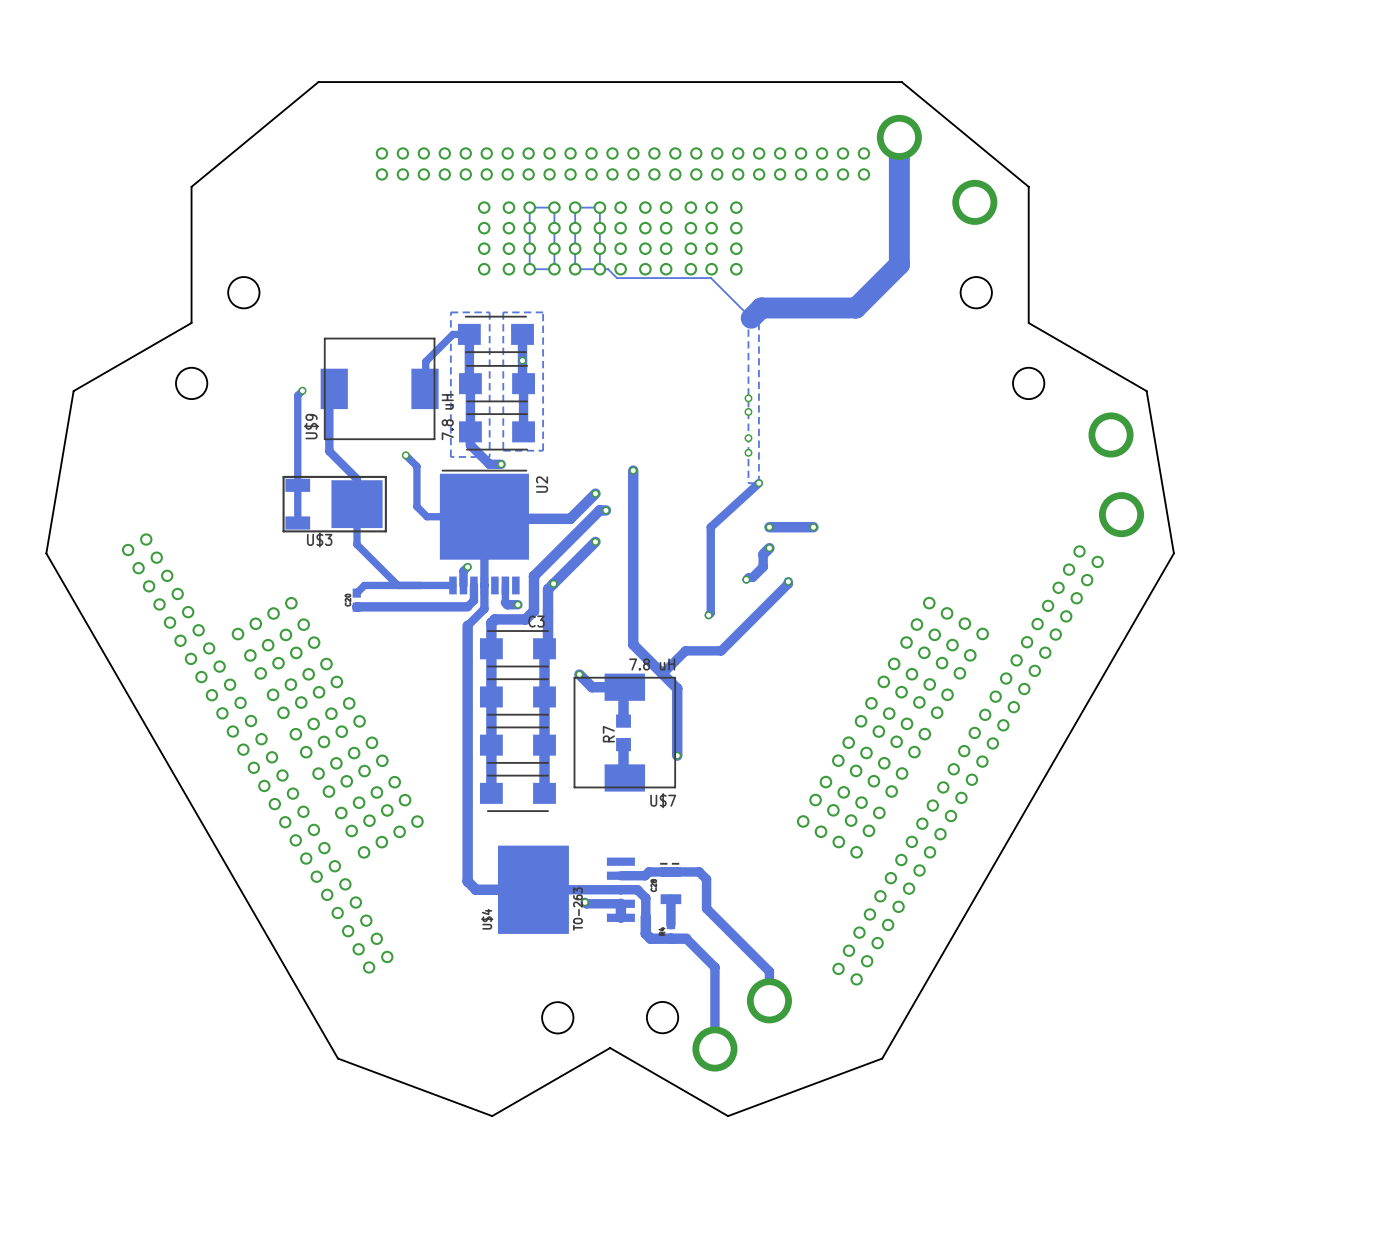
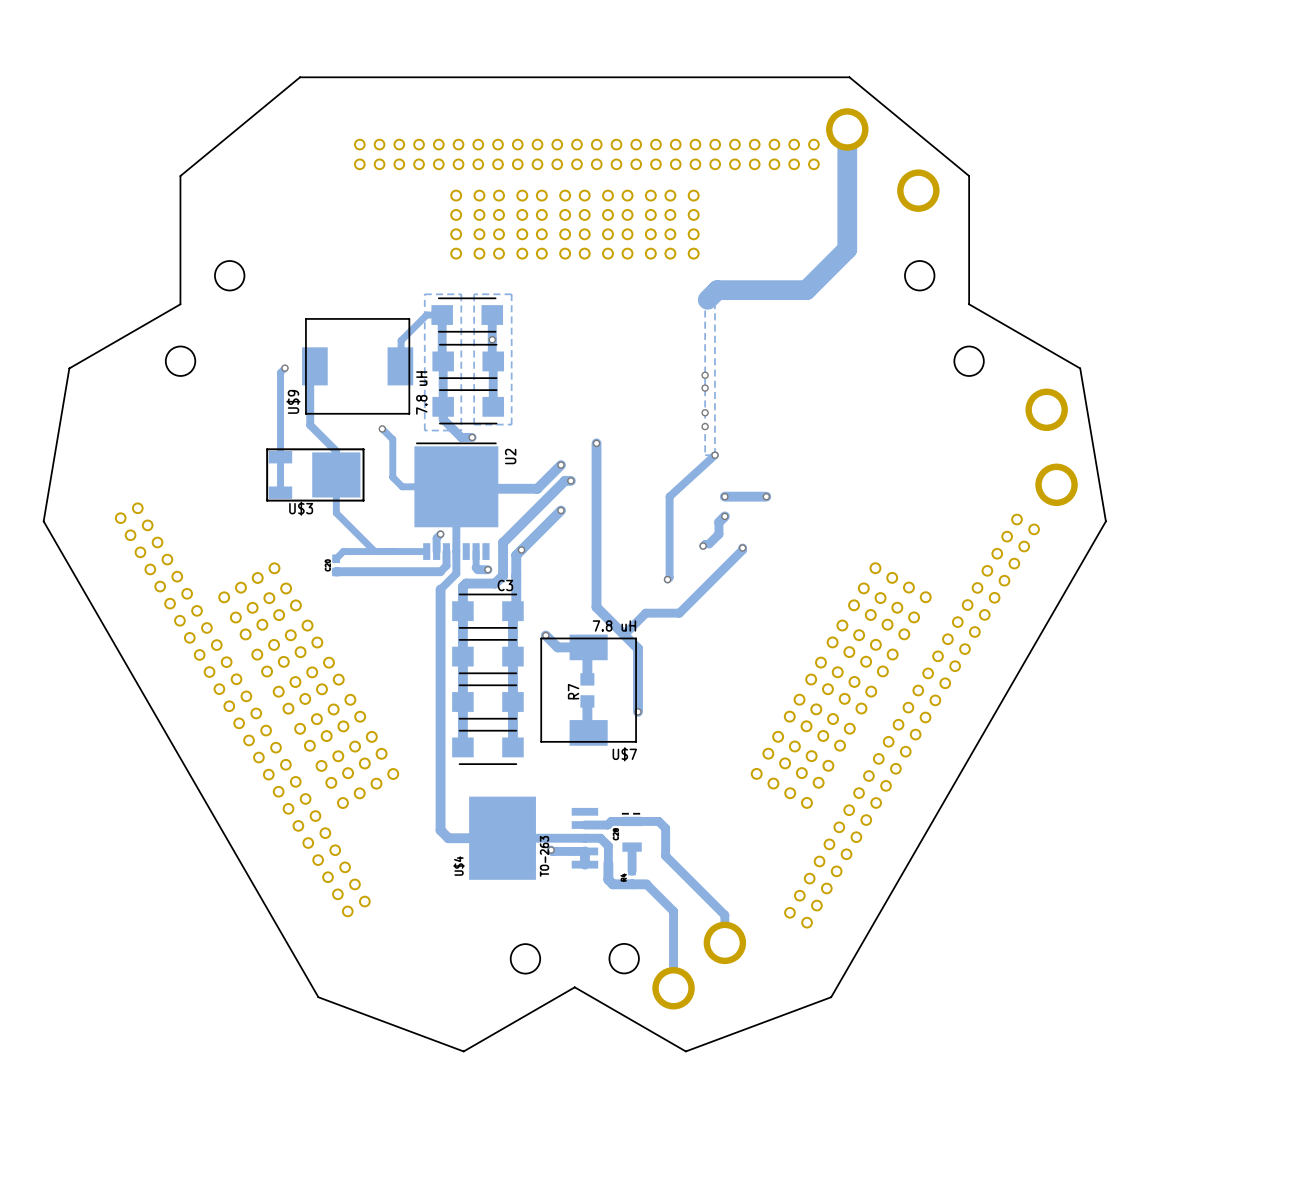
track: (554, 207) (529, 207) (529, 269) (554, 269) (554, 207) -> none
track: (599, 269) (599, 207) (575, 207) (575, 269) (608, 269) (616, 278) (710, 278) (751, 318) -> none

